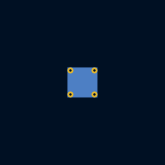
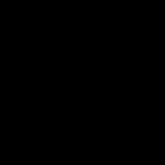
part: (82, 82) -> none

